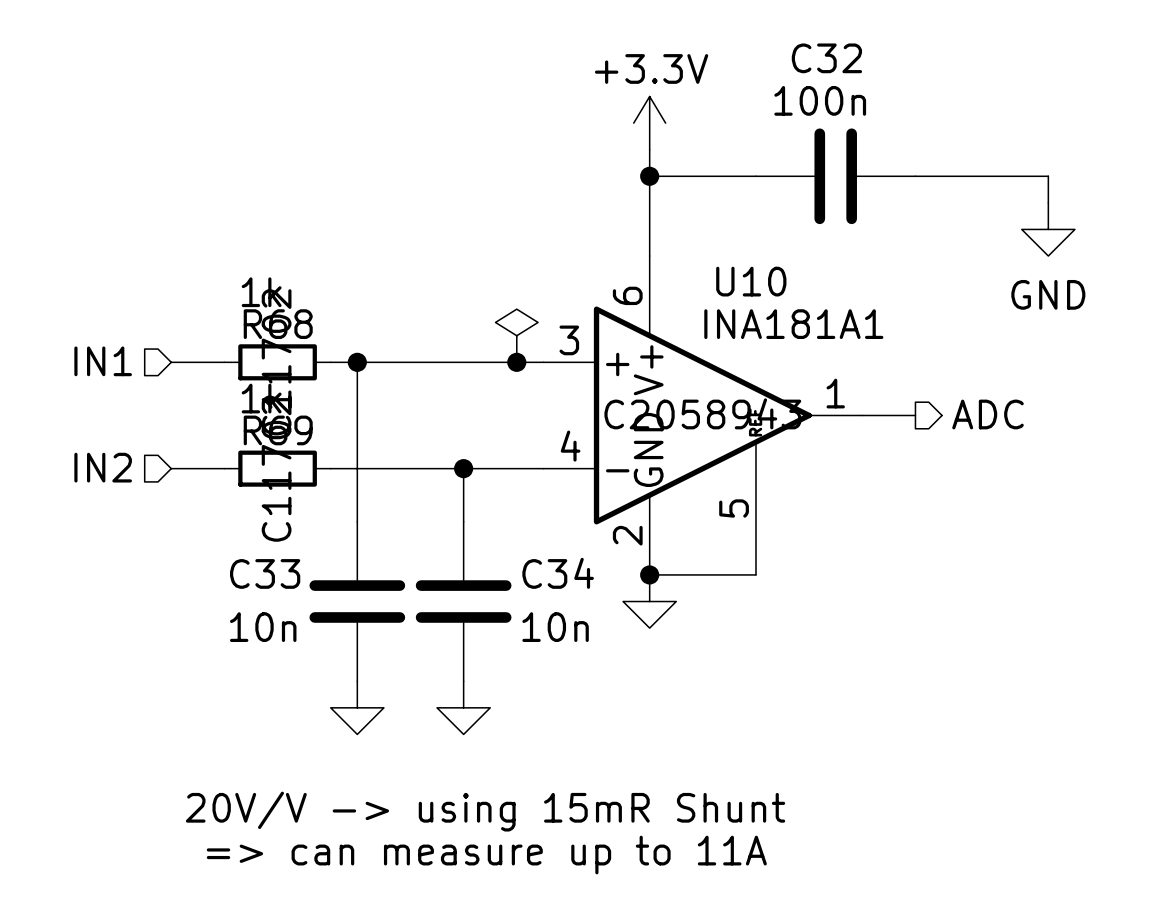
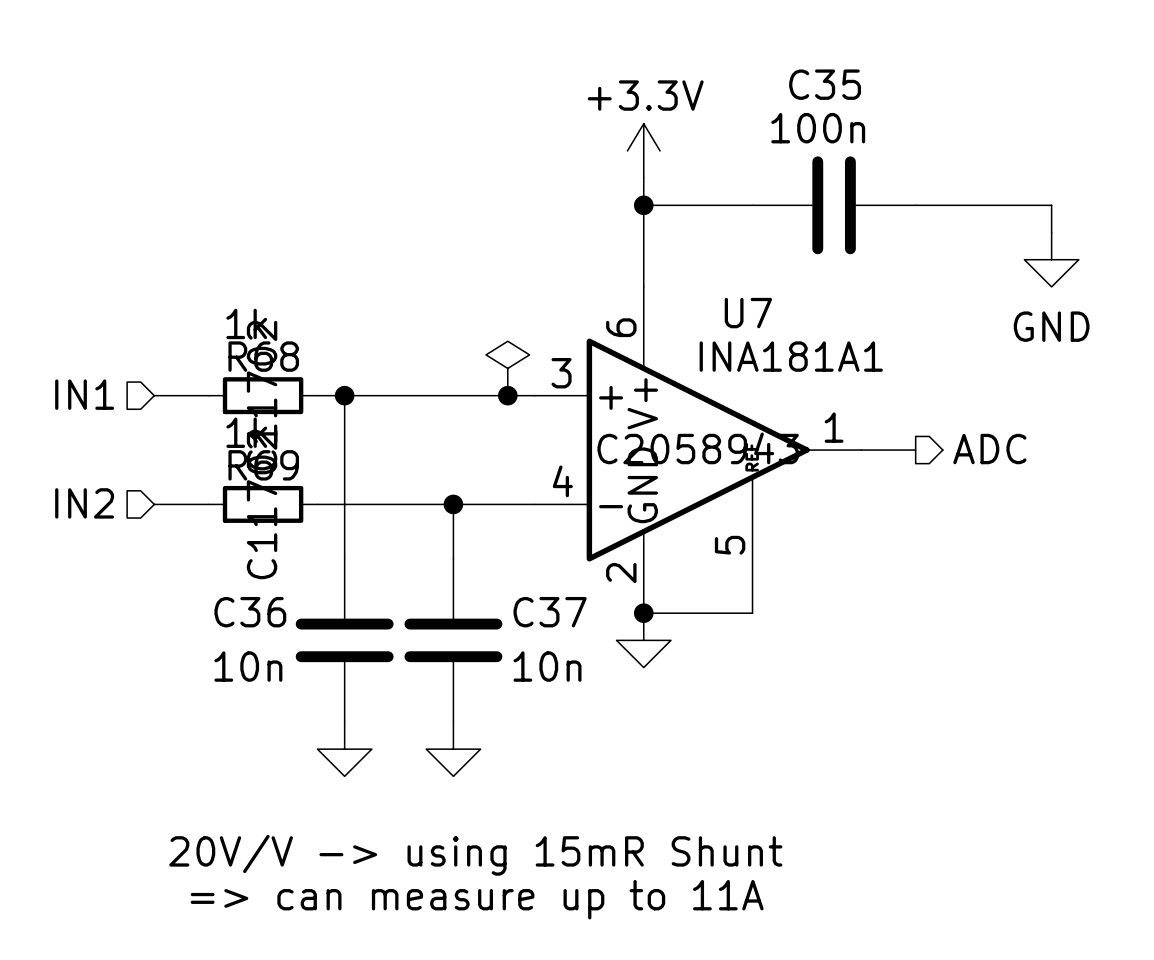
C32 name: C32 (826, 58) -> C35 (825, 84)
U10 name: U10 (751, 281) -> U7 (748, 313)
C33 name: C33 (265, 573) -> C36 (250, 612)
C34 name: C34 (558, 573) -> C37 (550, 612)

